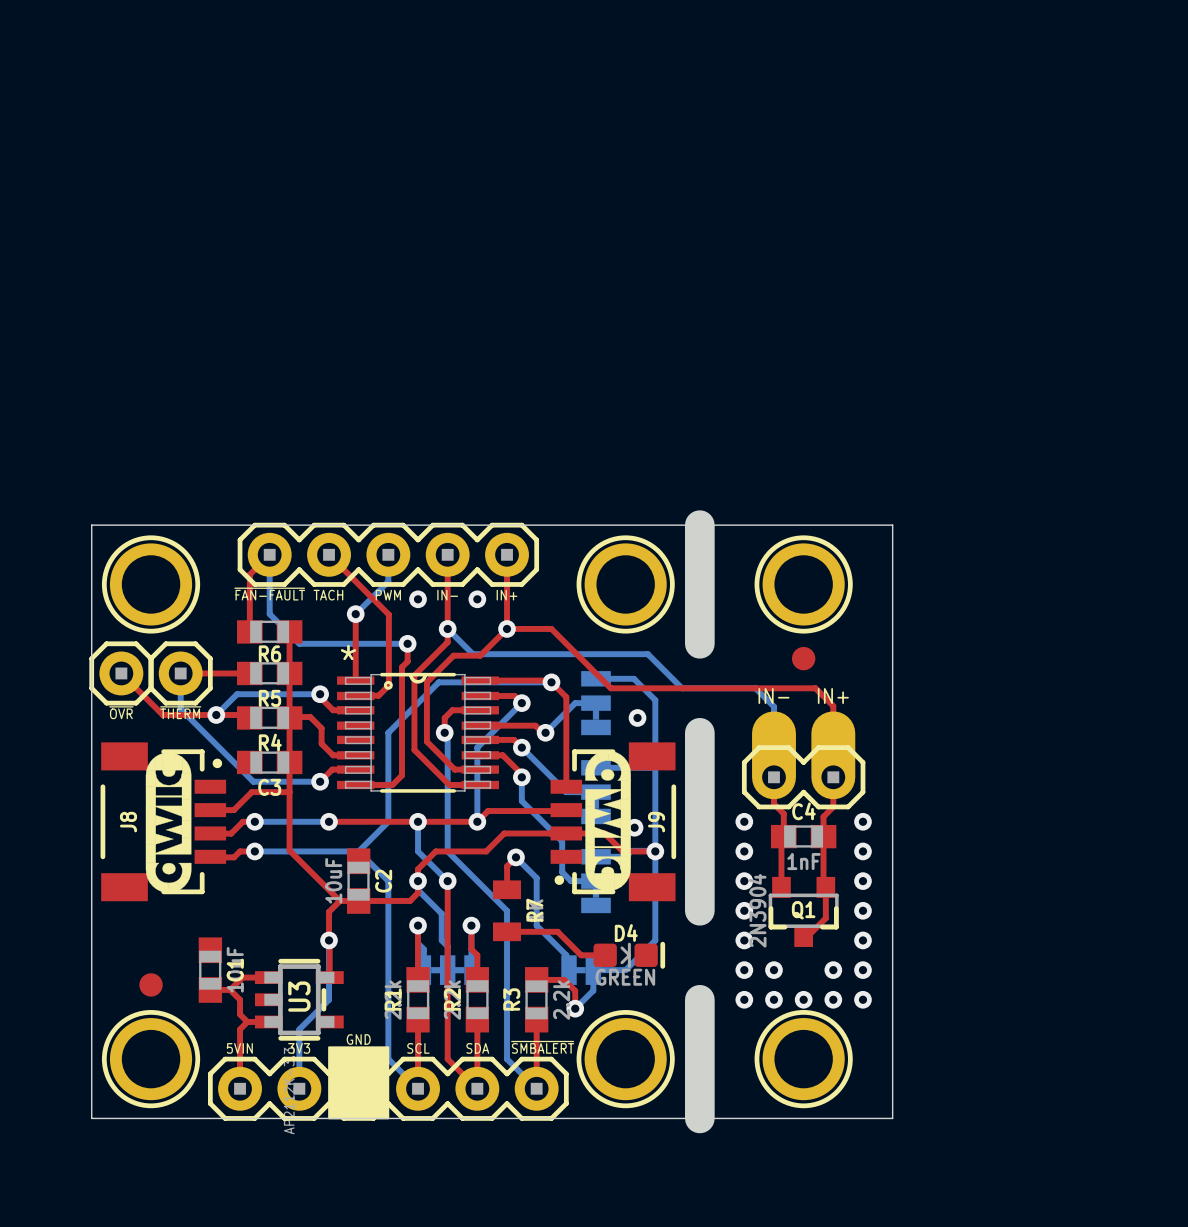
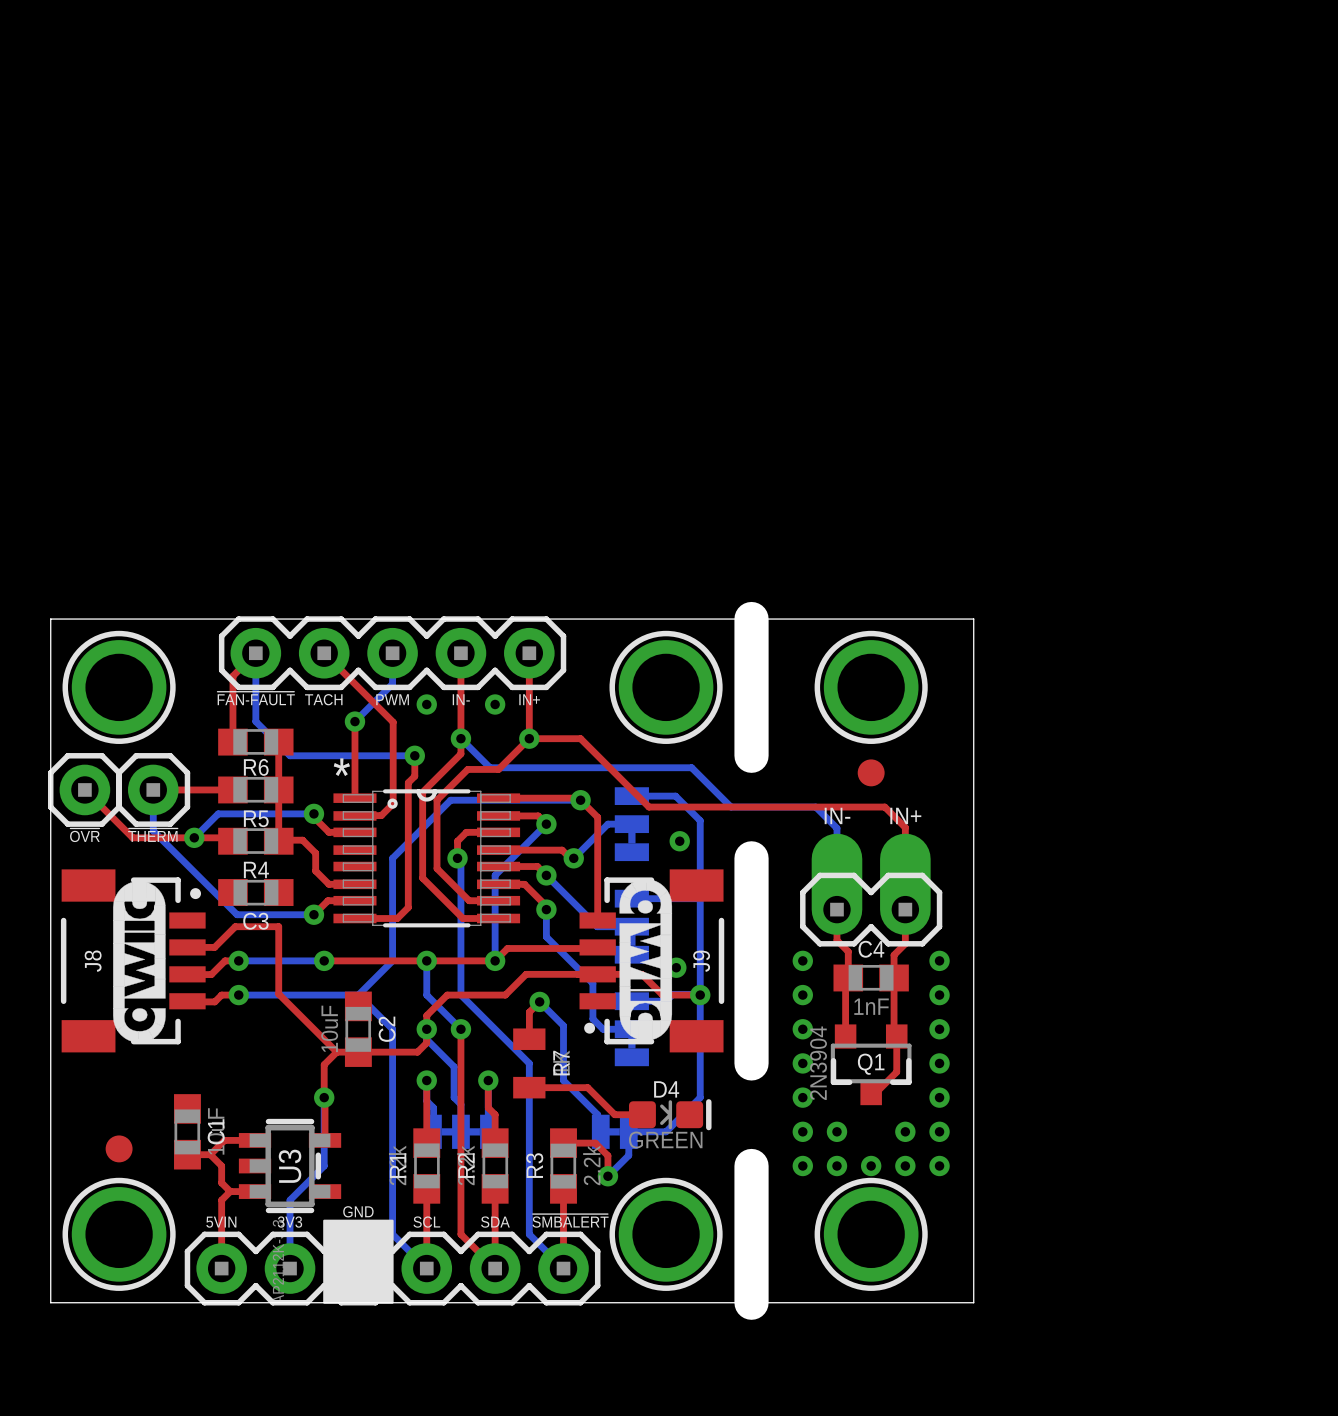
top track: (289, 717) (289, 792) -> none

